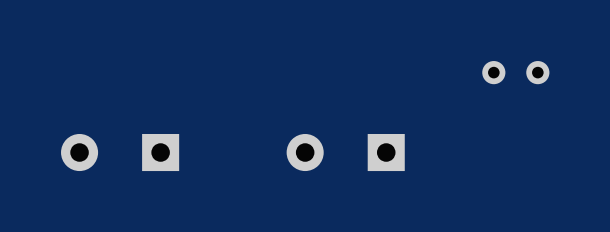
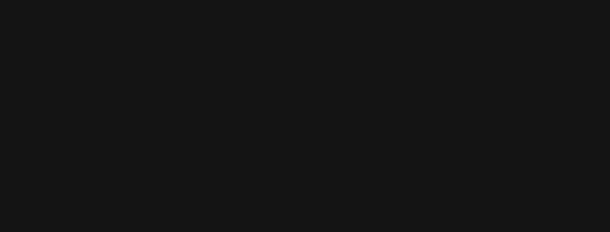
part: (515, 72) -> none
part: (120, 152) -> none
part: (345, 152) -> none

